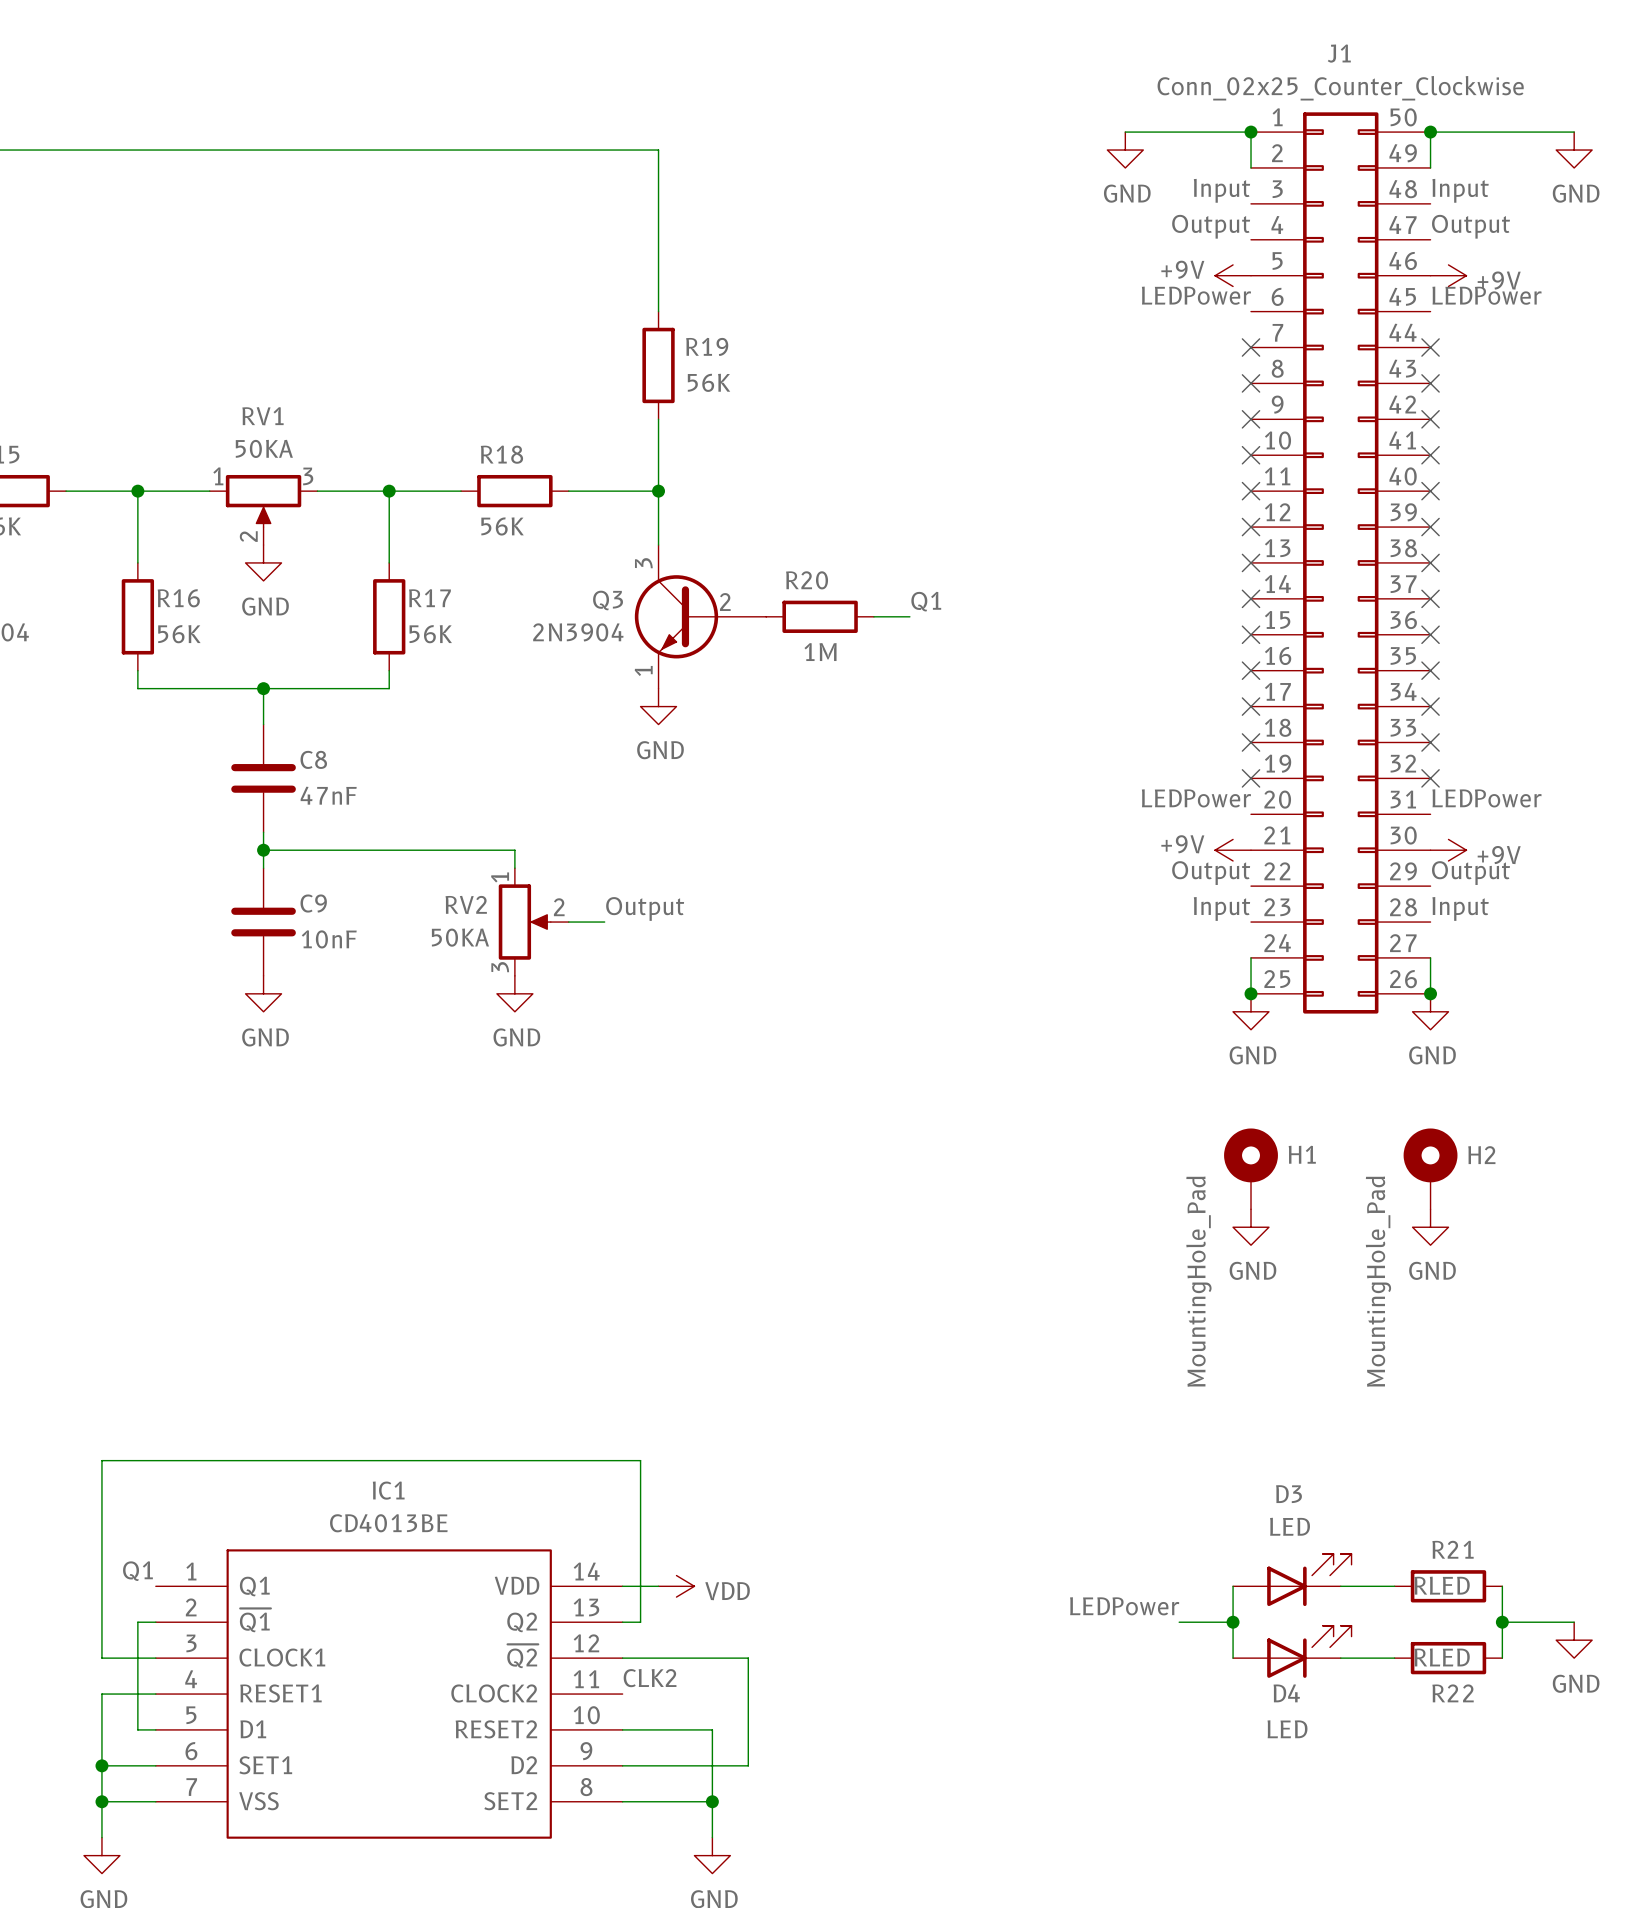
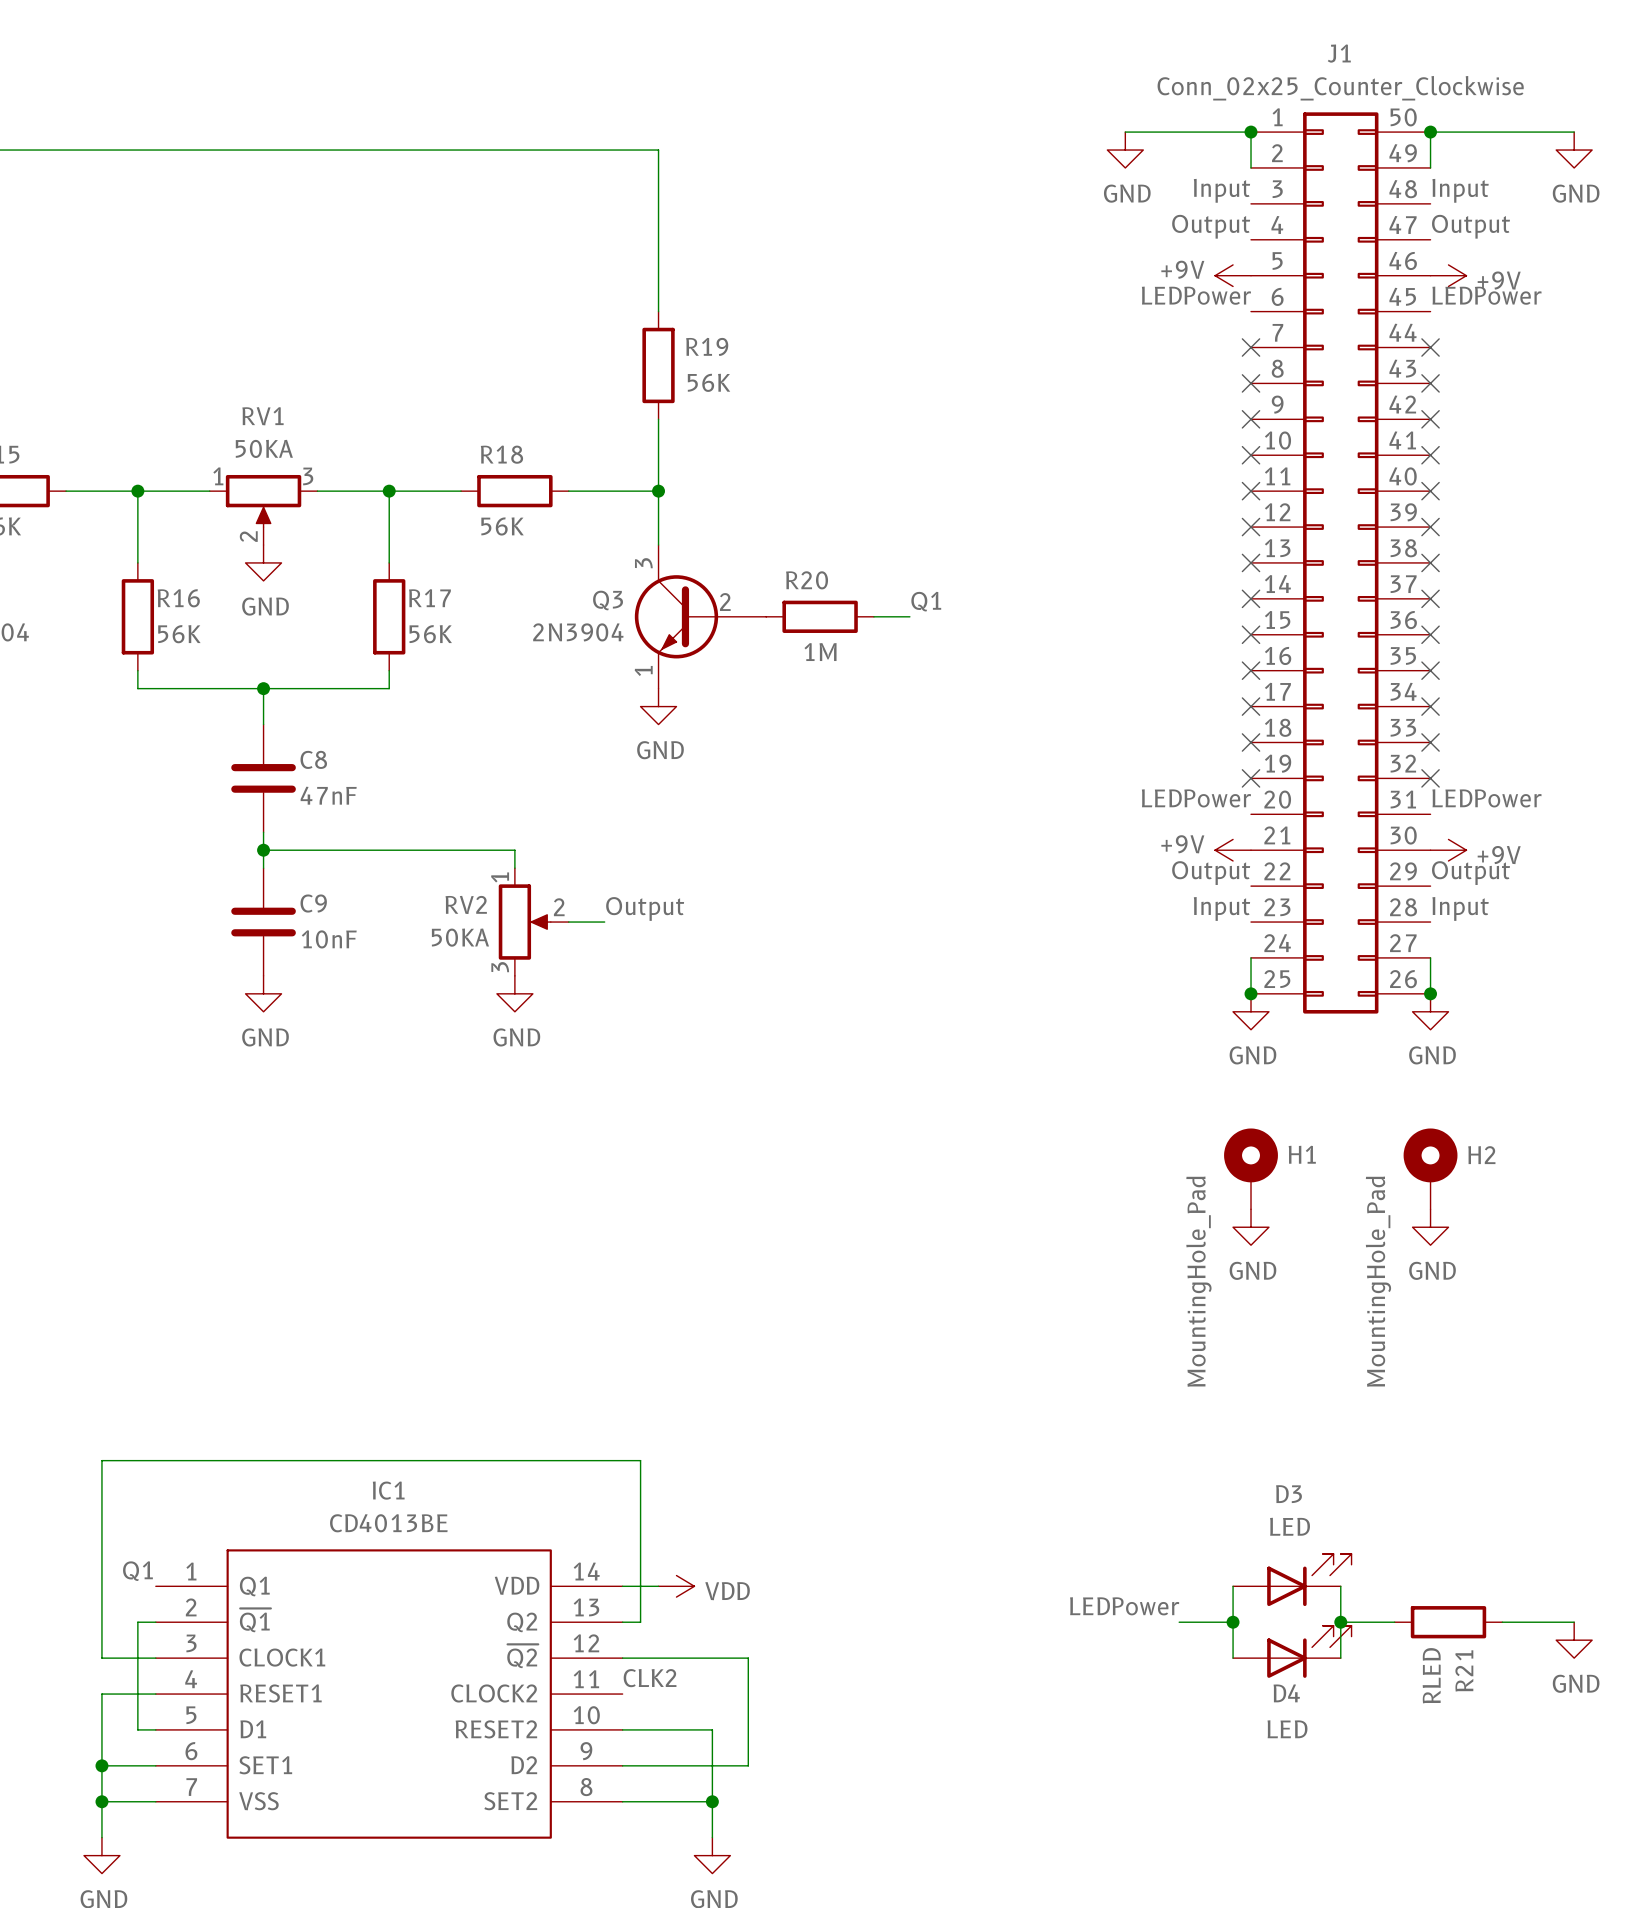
R21 name rotation: 0° (1453, 1549) -> 90° counterclockwise (1464, 1670)
R21 name position: R21 (1453, 1549) -> R21 (1464, 1670)
R21 value rotation: 0° (1442, 1585) -> 90° counterclockwise (1431, 1675)
wire: (1340, 1586) (1394, 1586) -> (1340, 1586) (1340, 1658)
R21 position: (1448, 1586) -> (1448, 1622)
wire: (1502, 1586) (1502, 1658) -> none
junction: none -> (1340, 1622)
junction: (1502, 1622) -> none
wire: (1340, 1658) (1394, 1658) -> (1340, 1622) (1394, 1622)
R22: RLED (1448, 1658) -> none

